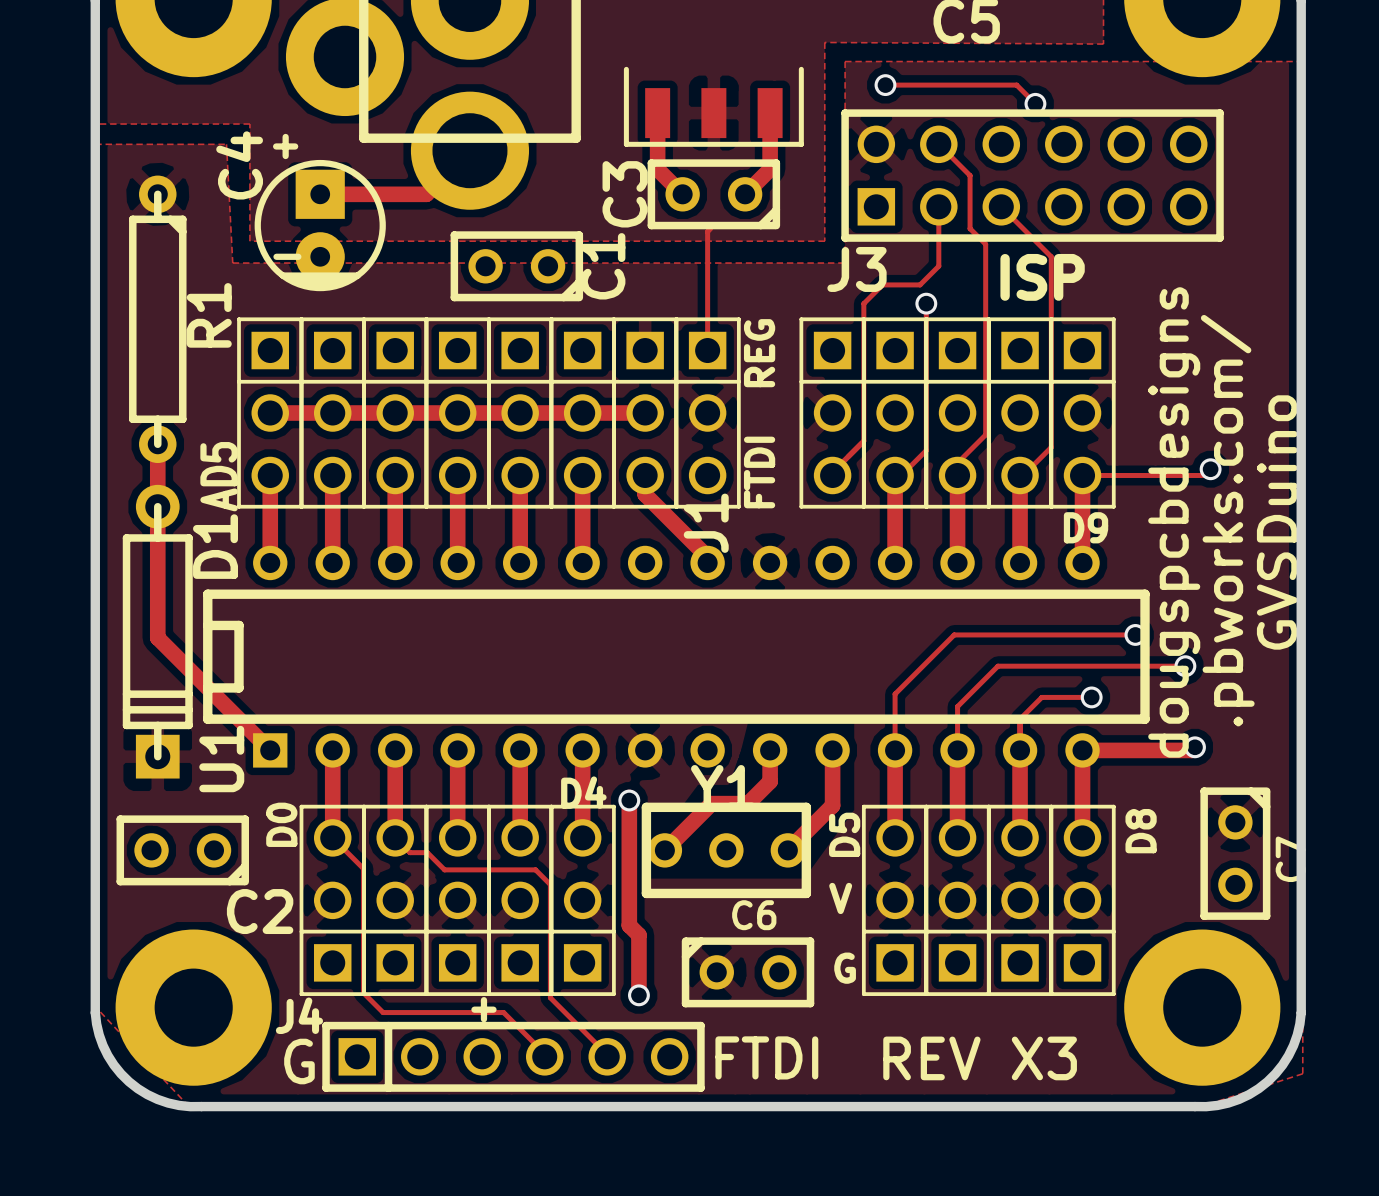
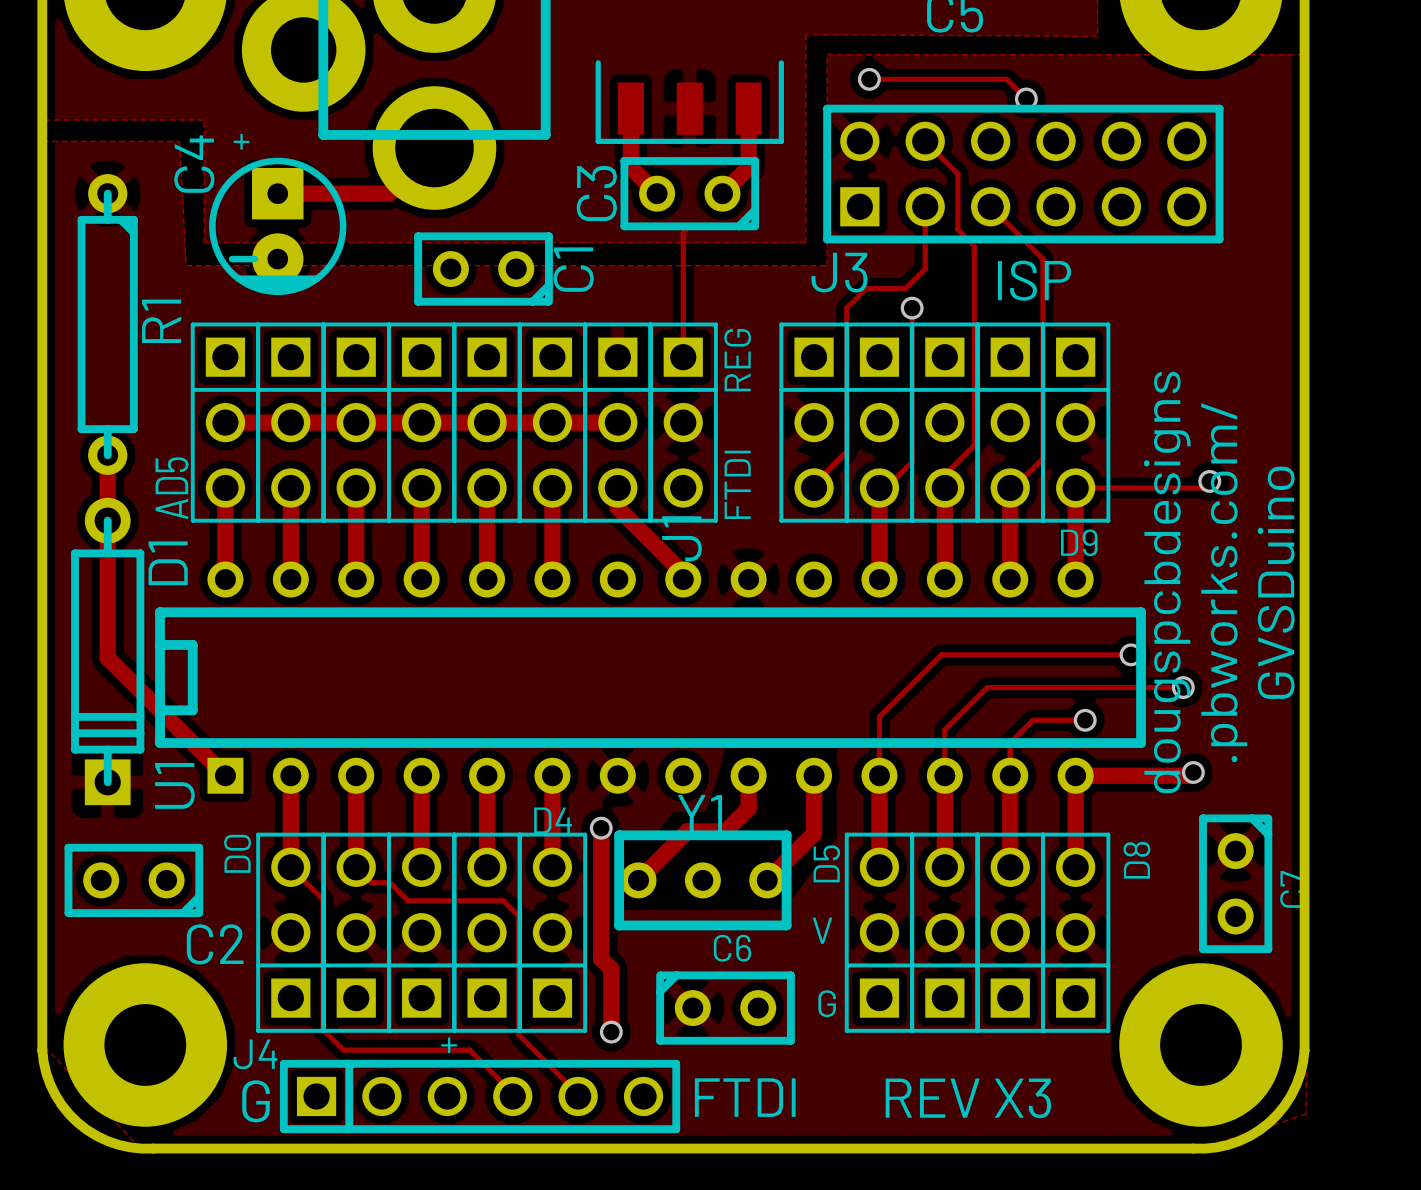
text position: .pbworks.com/ (1227, 520) -> .pbworks.com/ (1224, 582)
text position: dougspcbdesigns (1174, 522) -> dougspcbdesigns (1167, 582)
text position: GVSDuino (1277, 522) -> GVSDuino (1276, 582)

